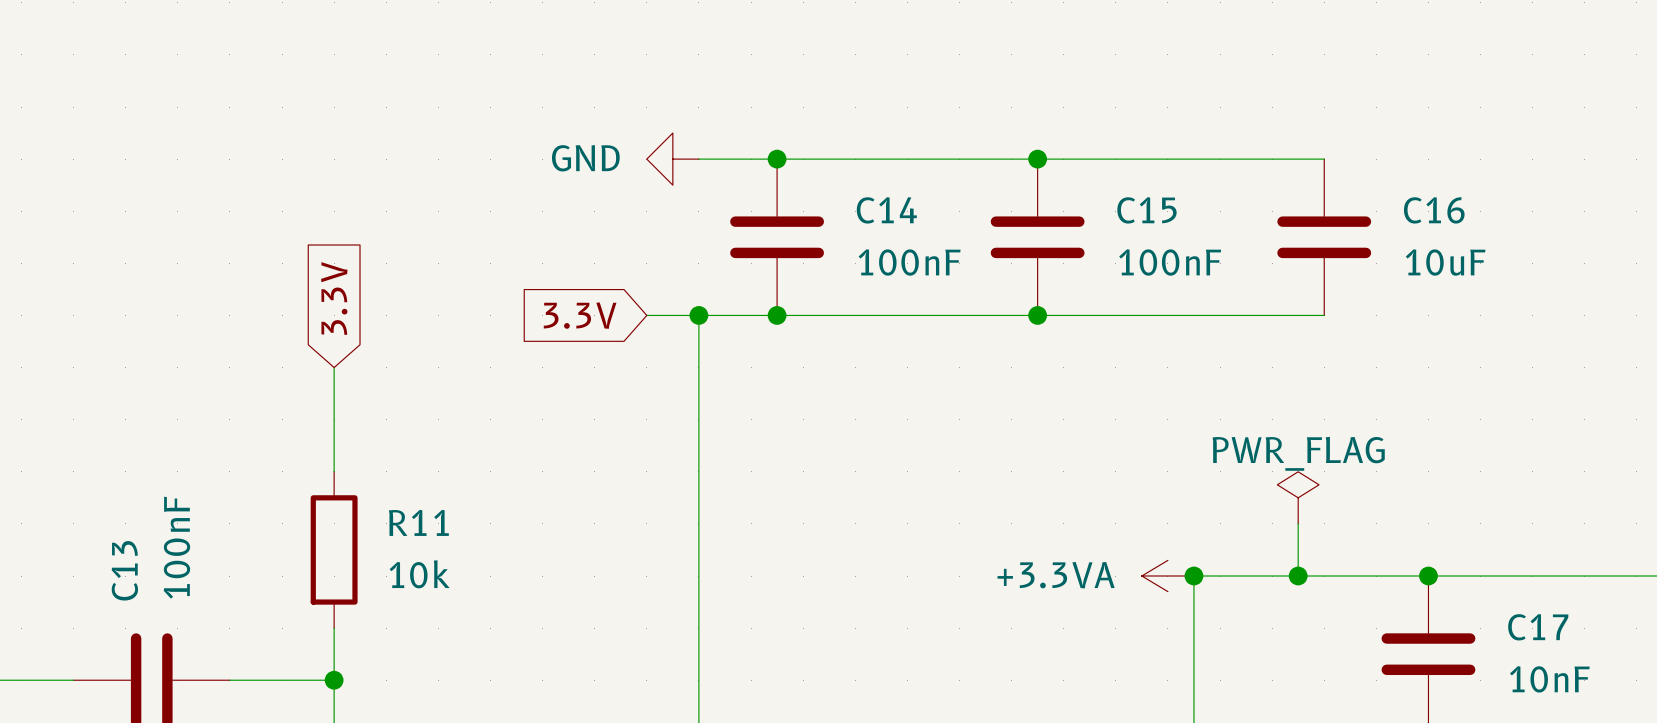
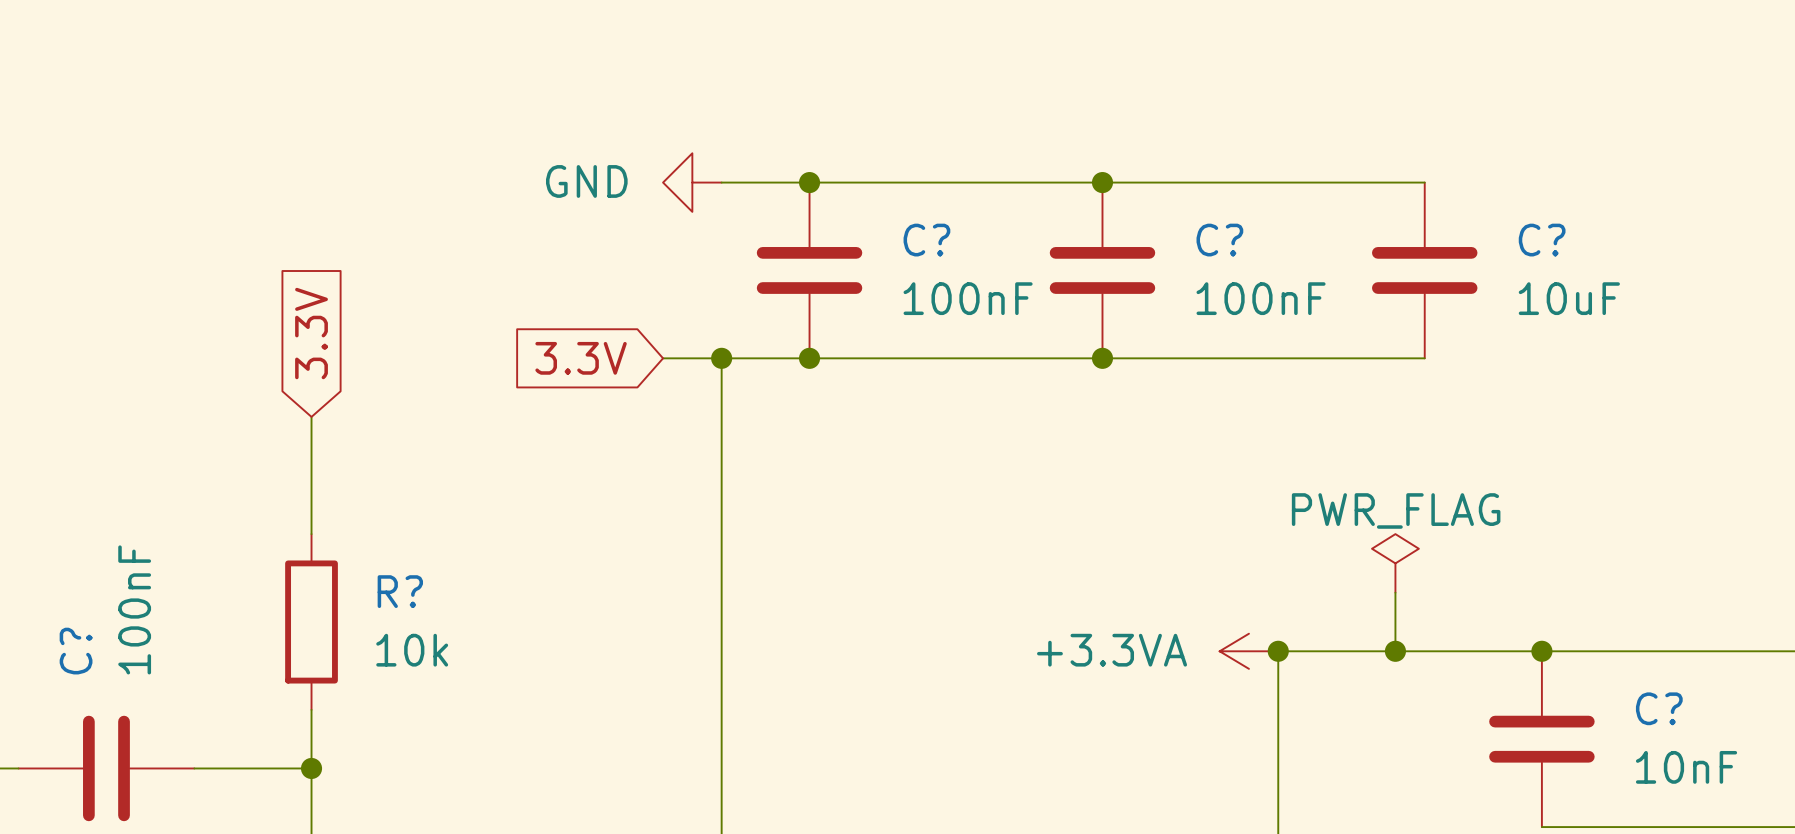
C14 name: C14 (886, 210) -> C? (926, 240)
C15 name: C15 (1146, 210) -> C? (1219, 240)
C16 name: C16 (1434, 210) -> C? (1542, 240)
R11 name: R11 (418, 522) -> R? (400, 591)
C13 name: C13 (124, 570) -> C? (76, 651)
C17 name: C17 (1538, 627) -> C? (1659, 708)

